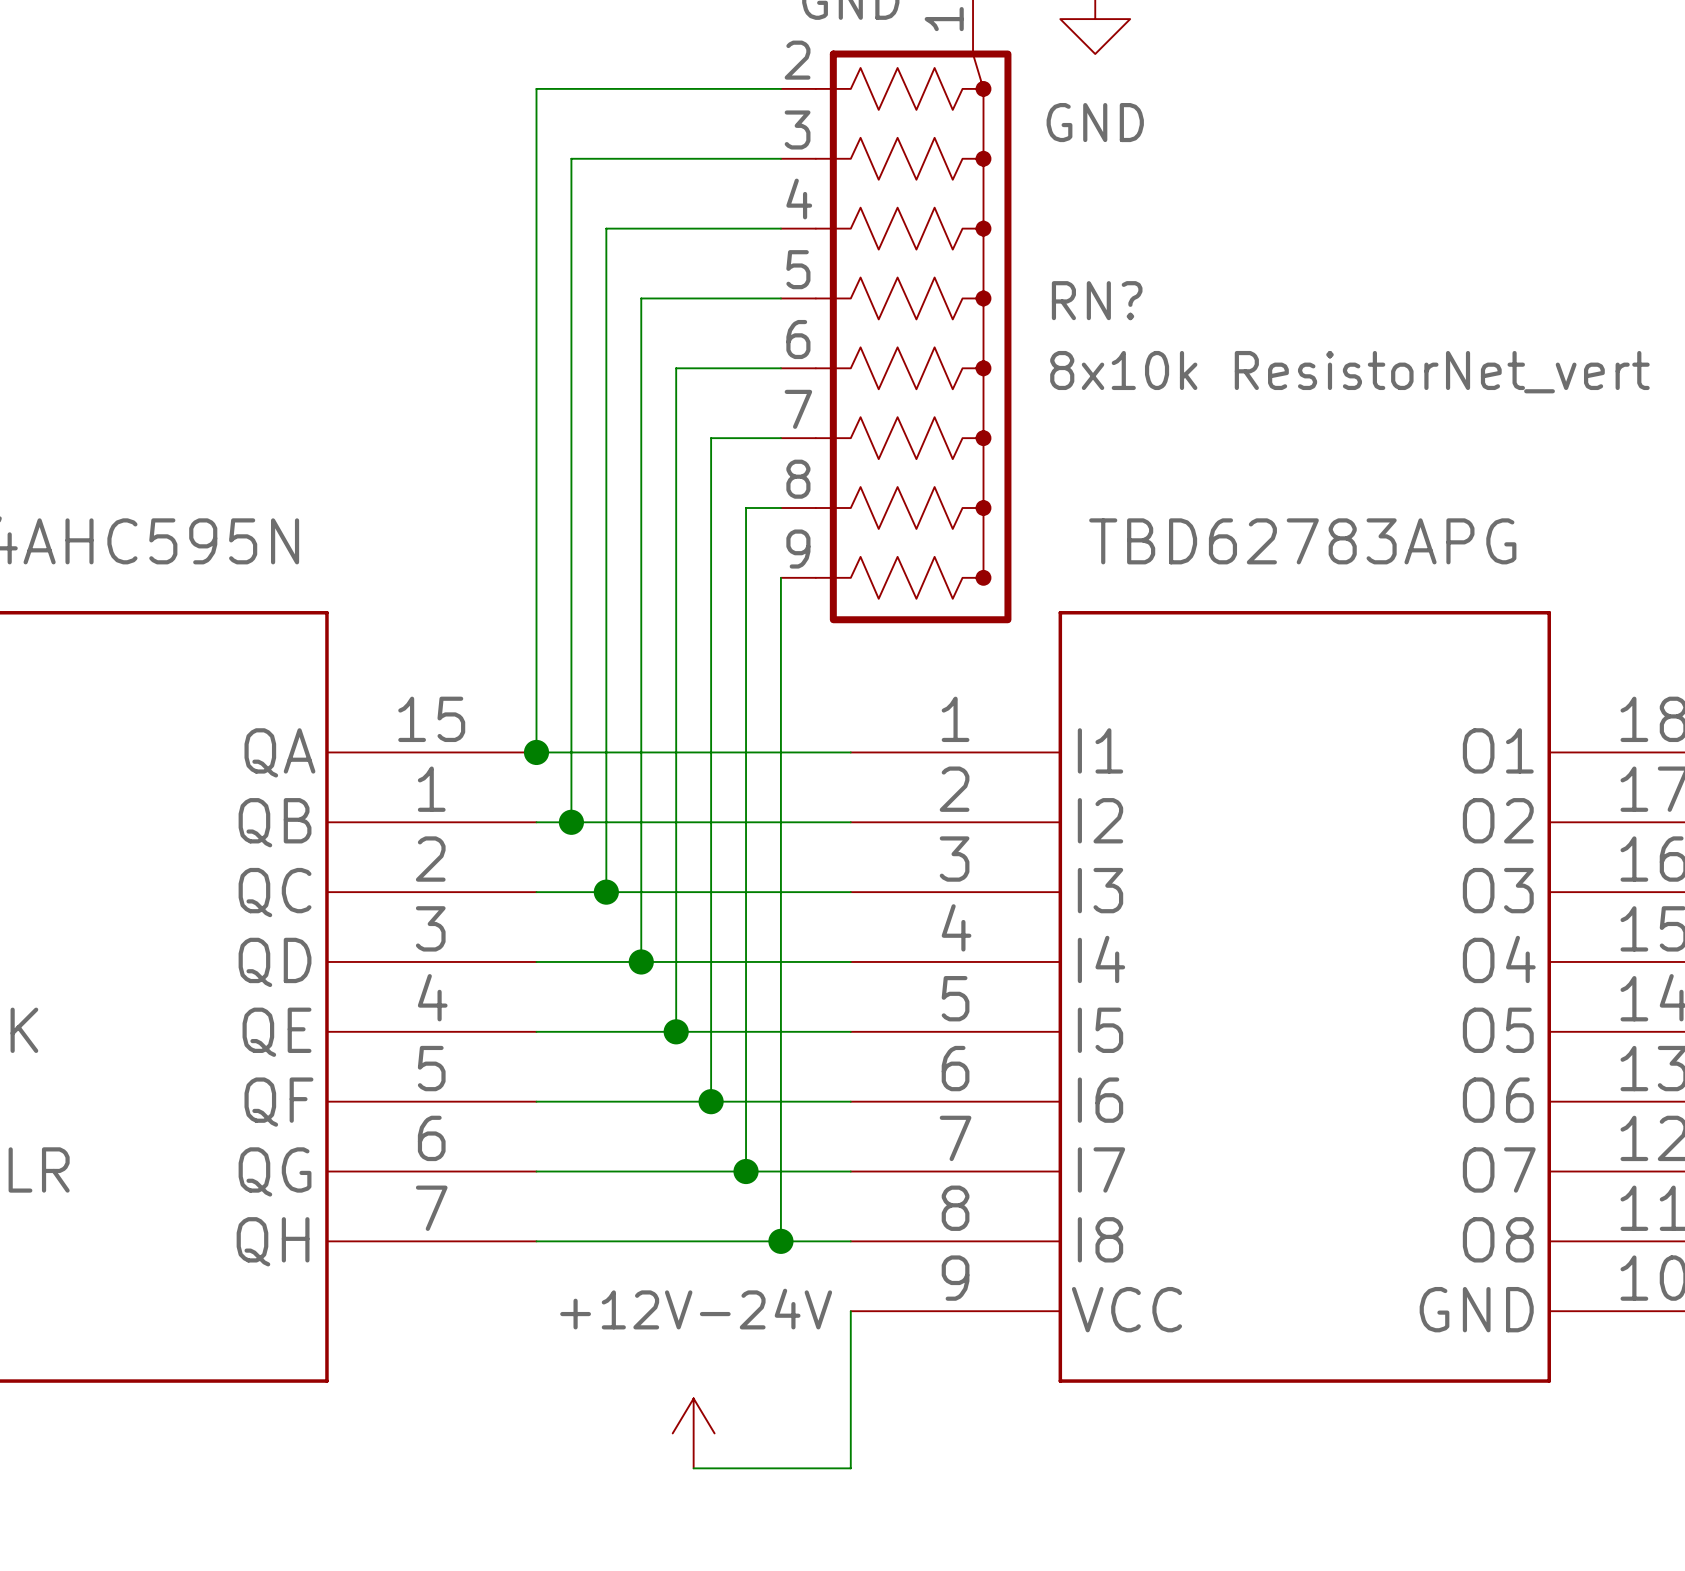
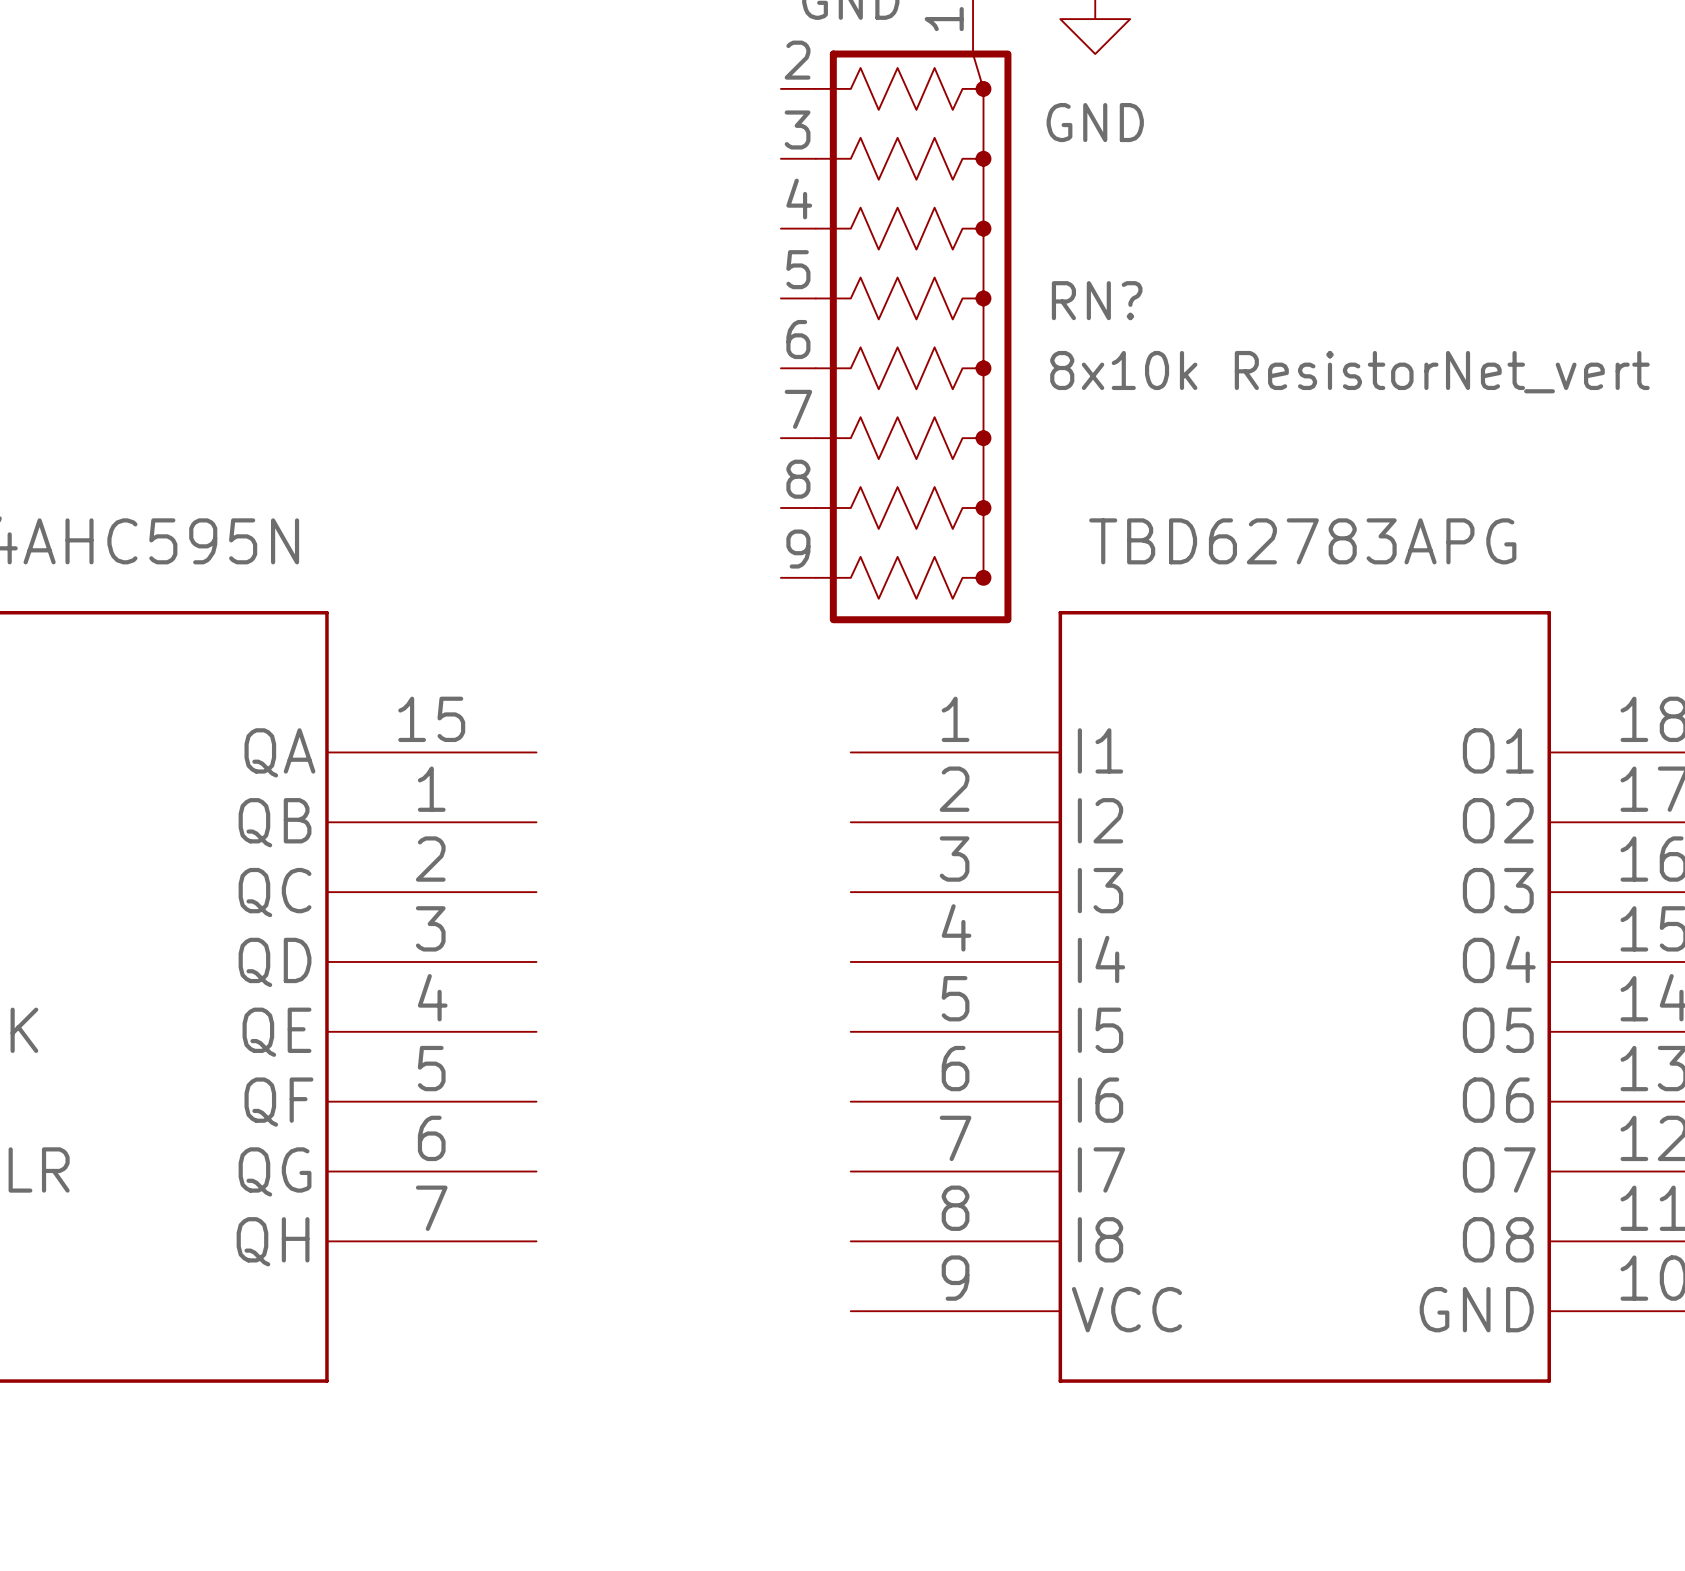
wire: (780, 88) (536, 88) (536, 752) (850, 752) -> none
wire: (780, 158) (571, 158) (571, 822) -> none
wire: (780, 228) (606, 228) (606, 892) -> none
wire: (780, 298) (641, 298) (641, 961) -> none
wire: (780, 368) (676, 368) (676, 1031) -> none
wire: (780, 438) (711, 438) (711, 1101) -> none
wire: (780, 508) (746, 508) (746, 1171) -> none
wire: (780, 577) (780, 1241) -> none
junction: (536, 752) -> none
wire: (536, 822) (850, 822) -> none
junction: (571, 822) -> none
wire: (536, 892) (850, 892) -> none
junction: (606, 892) -> none
wire: (536, 961) (850, 961) -> none
junction: (641, 961) -> none
wire: (536, 1031) (850, 1031) -> none
junction: (676, 1031) -> none
wire: (536, 1101) (850, 1101) -> none
junction: (711, 1101) -> none
wire: (536, 1171) (850, 1171) -> none
junction: (746, 1171) -> none
wire: (536, 1241) (850, 1241) -> none
junction: (780, 1241) -> none
wire: (850, 1311) (850, 1468) (693, 1468) -> none
power symbol: +12V-24V (693, 1433) -> none

